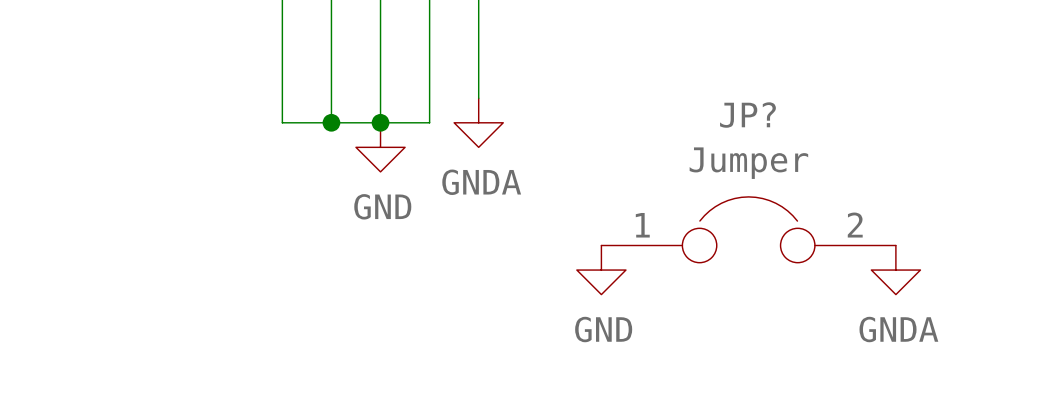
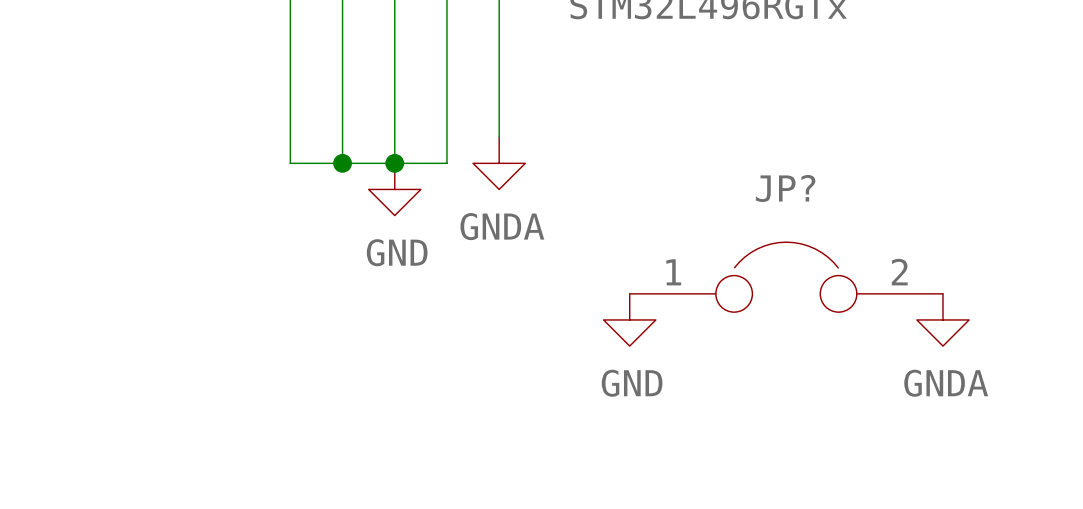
JP? name position: JP? (747, 115) -> JP? (785, 188)
JP? value: Jumper (748, 163) -> none

